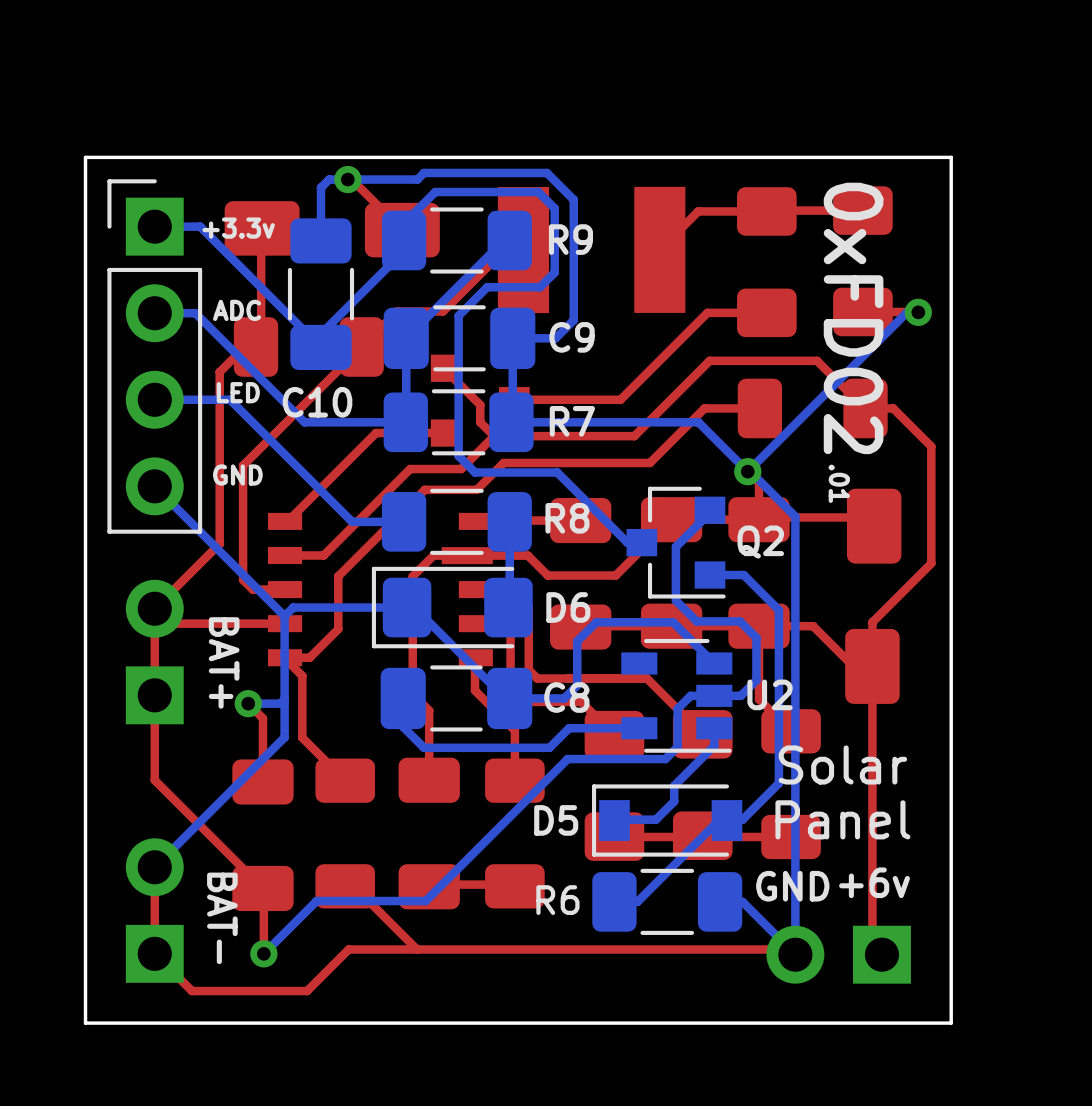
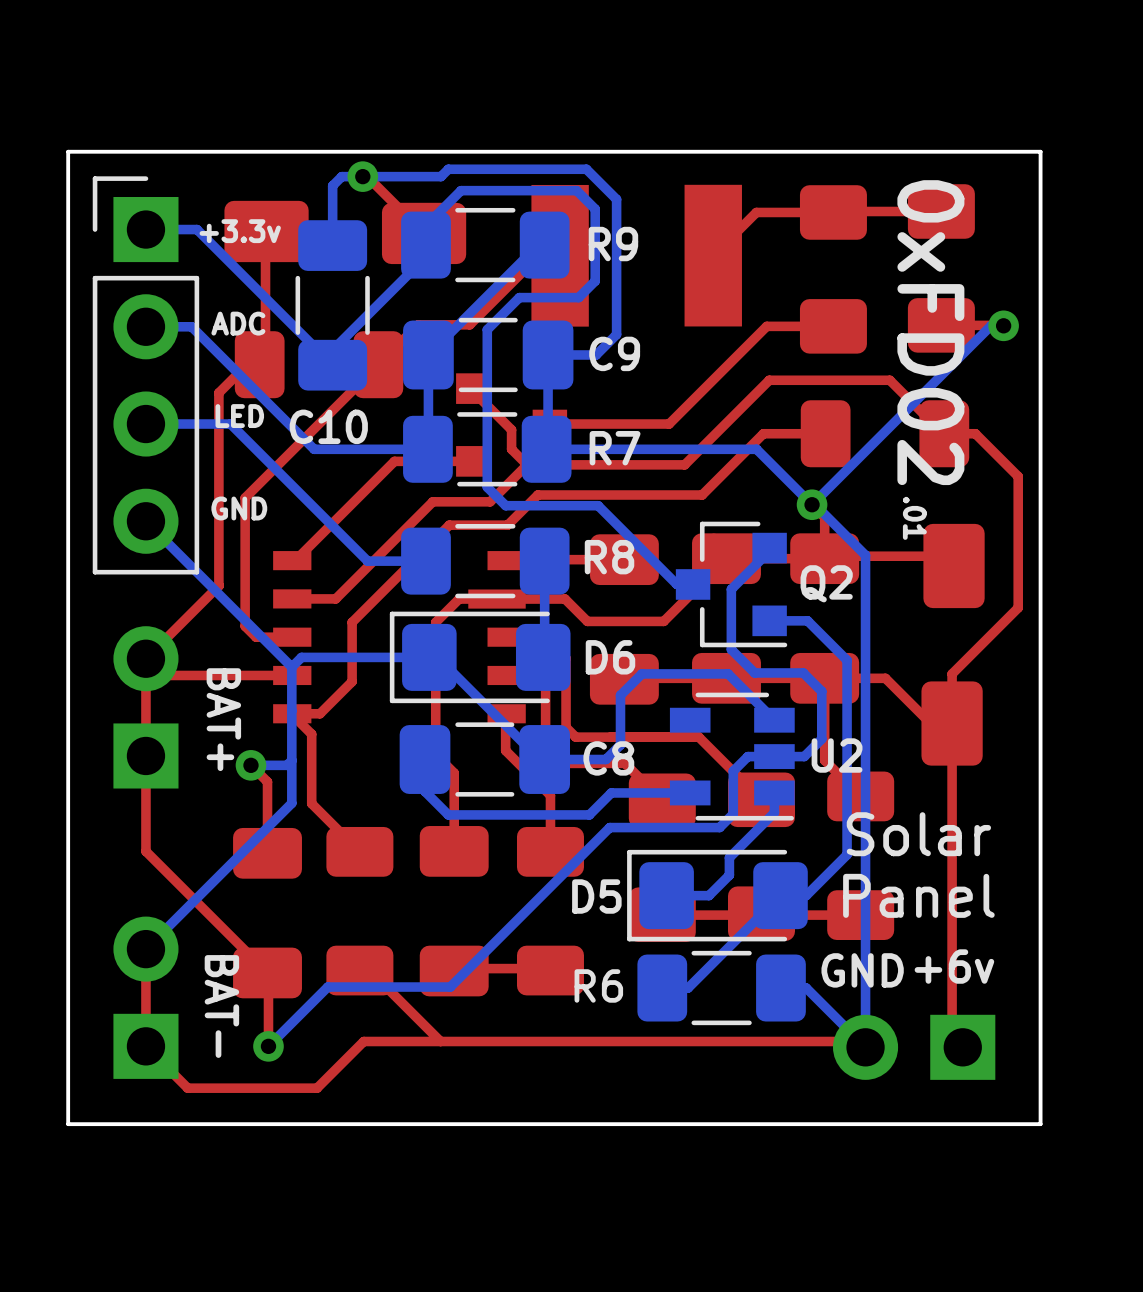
D5 footprint: [592, 784, 743, 857] -> [627, 849, 808, 942]

